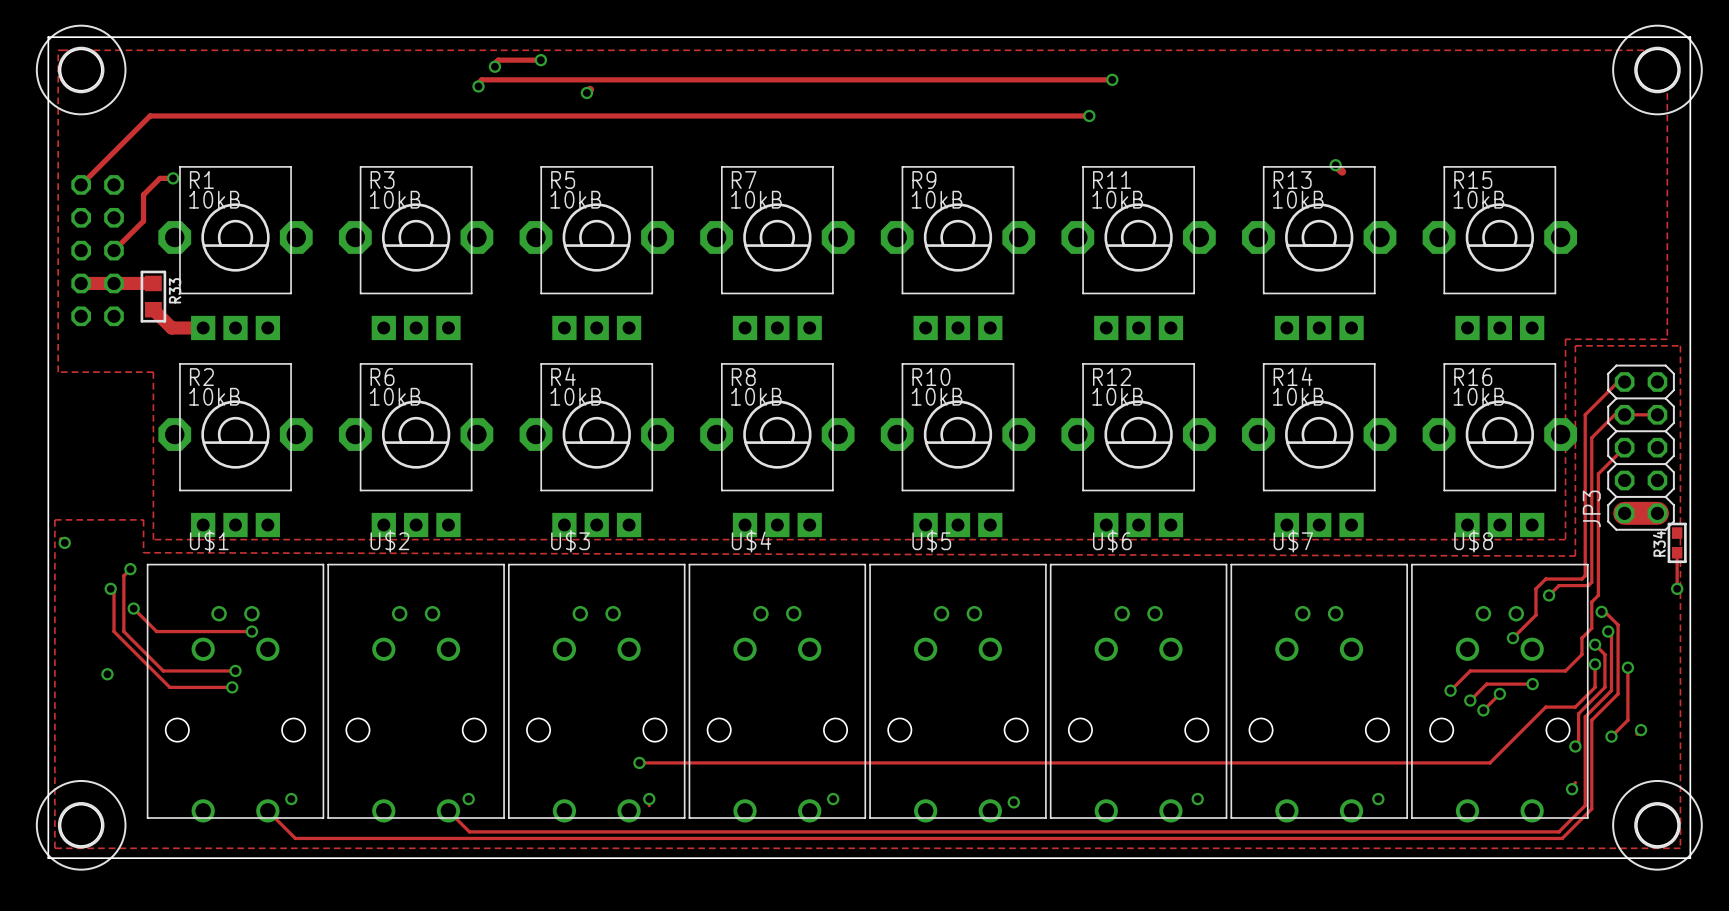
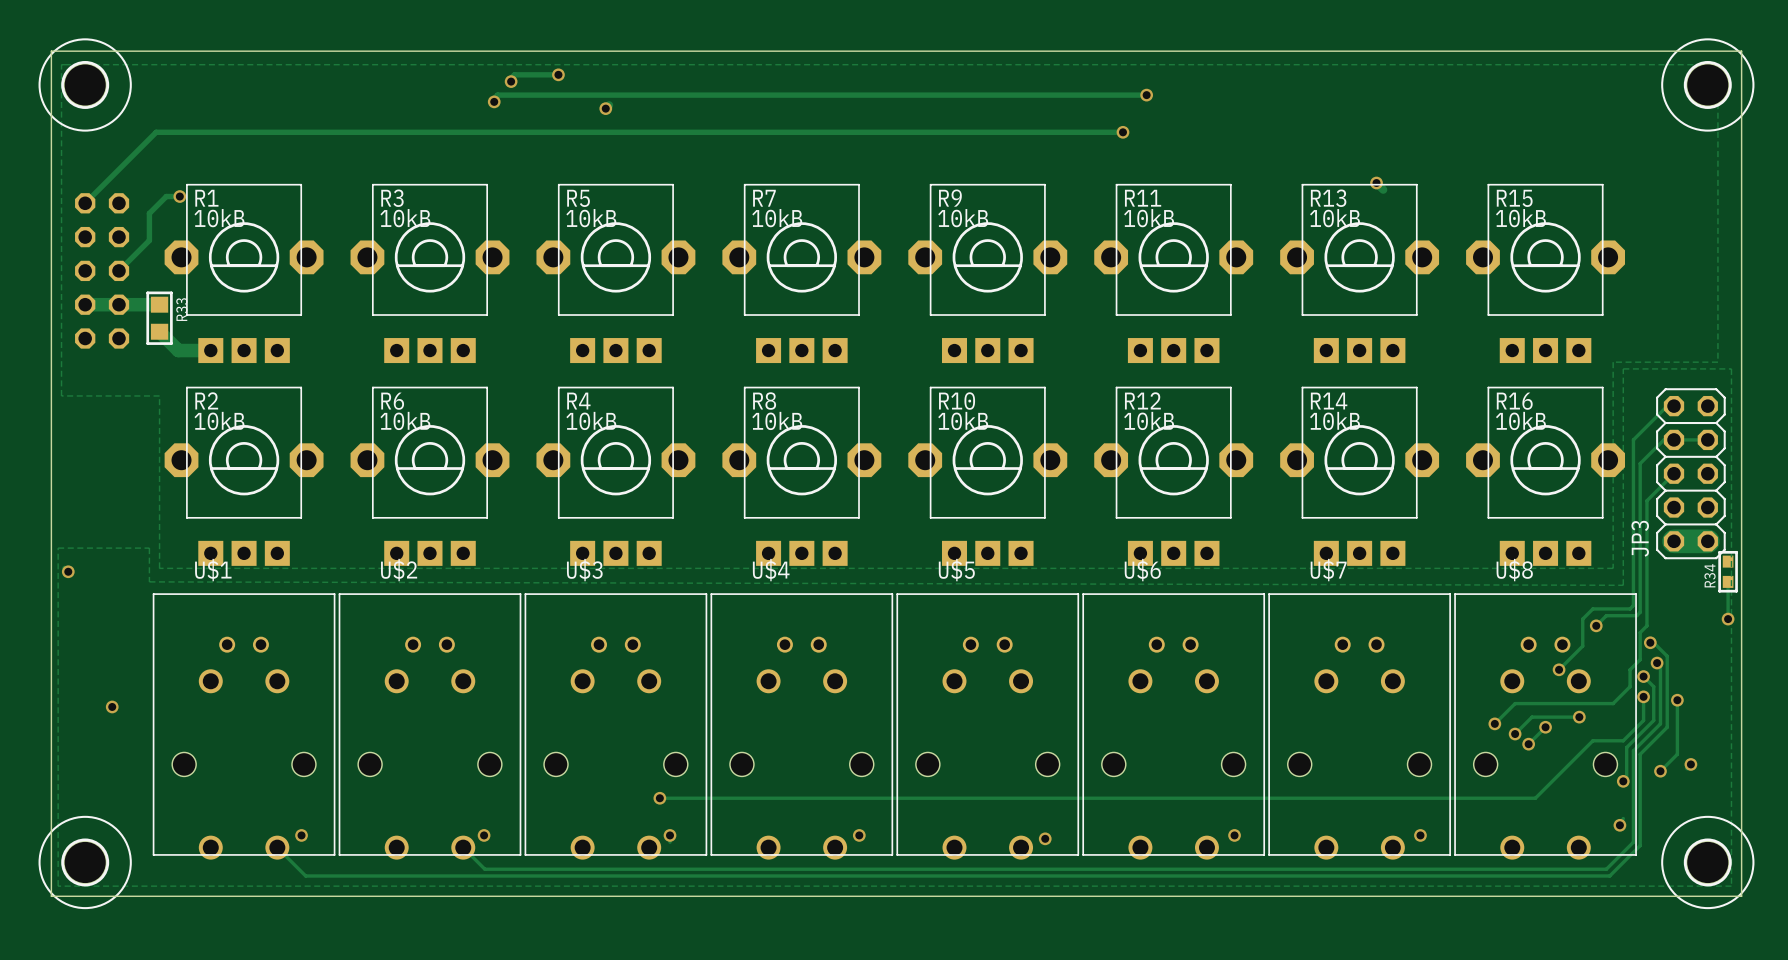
track: (130, 569) (123, 575) (123, 631) (163, 670) (235, 670) -> none
via: (130, 569) -> none
track: (110, 588) (114, 592) (114, 631) (169, 687) (232, 687) -> none
via: (110, 588) -> none
track: (133, 608) (156, 631) (251, 631) -> none
via: (133, 608) -> none
via: (251, 631) -> none
via: (235, 670) -> none
via: (232, 687) -> none

